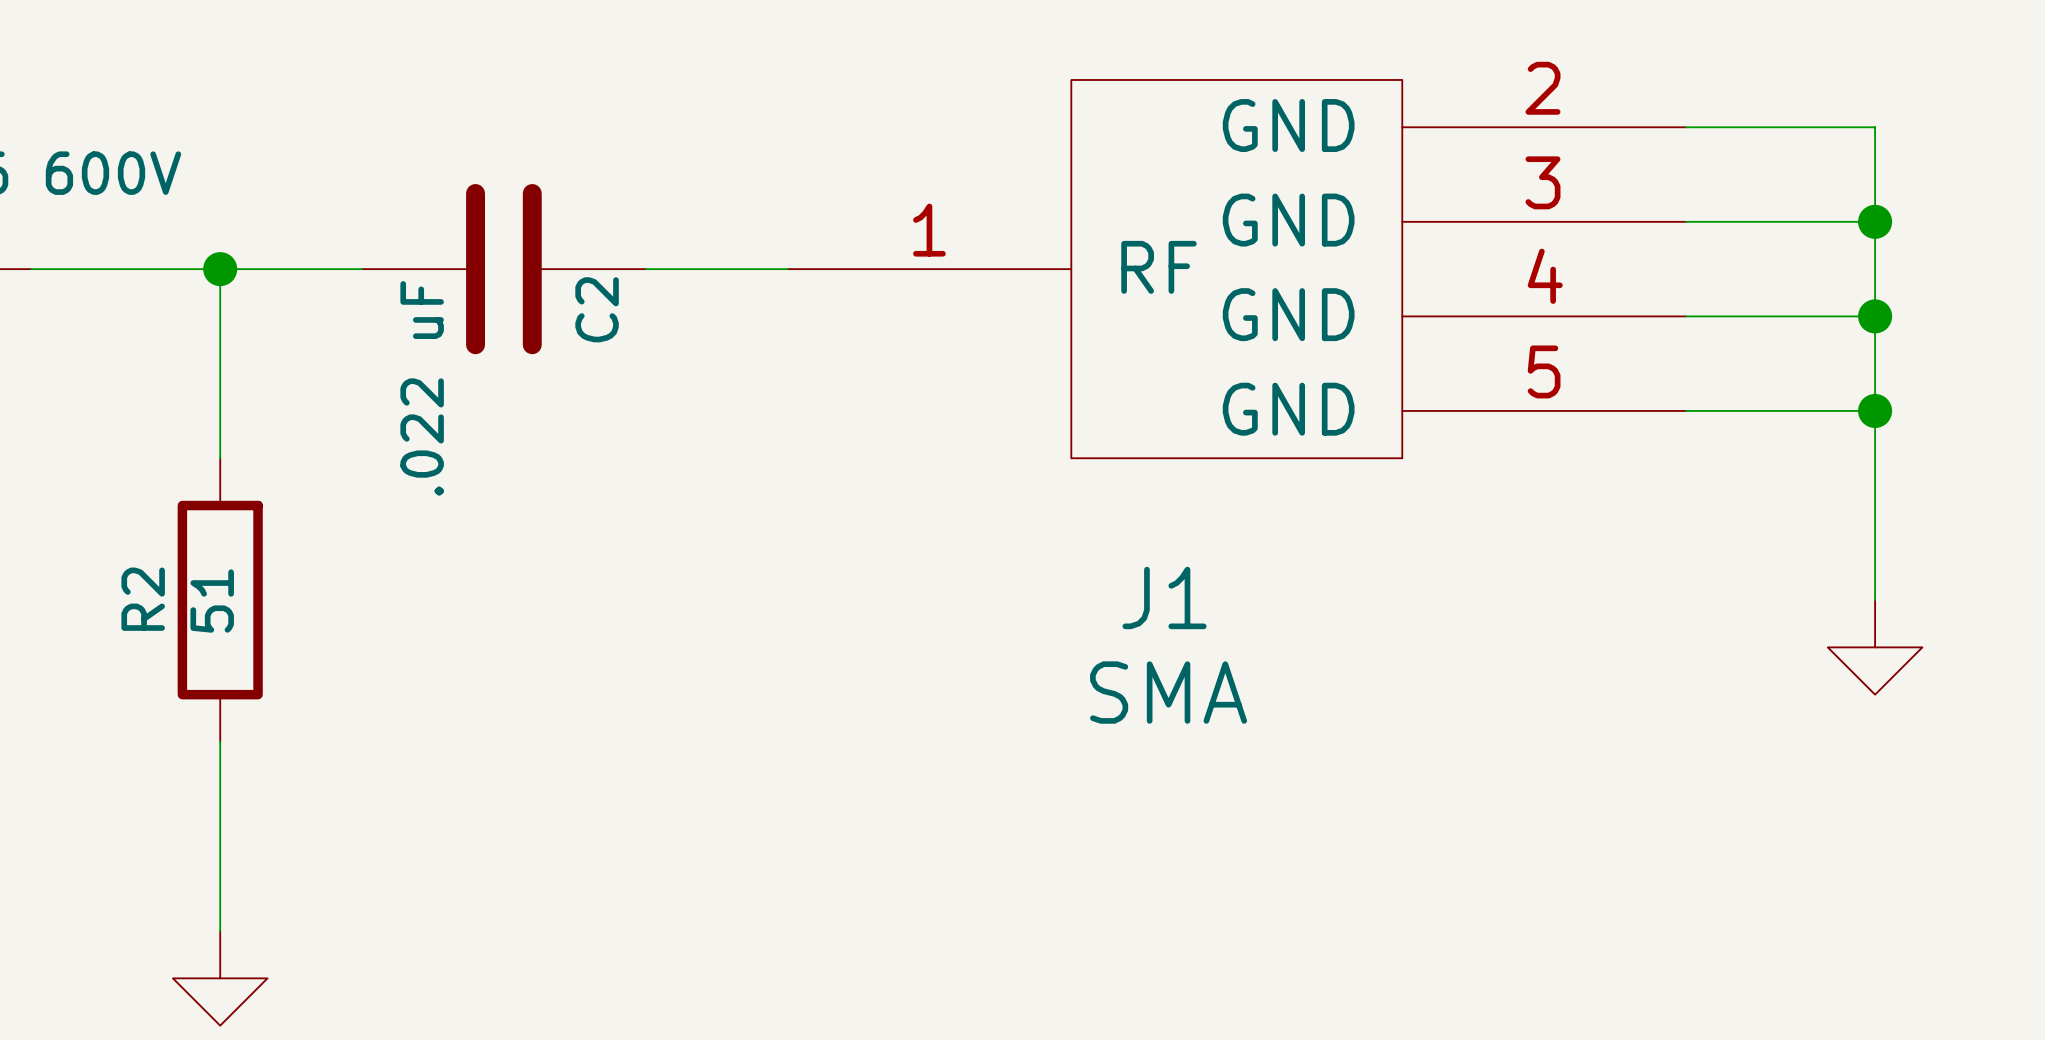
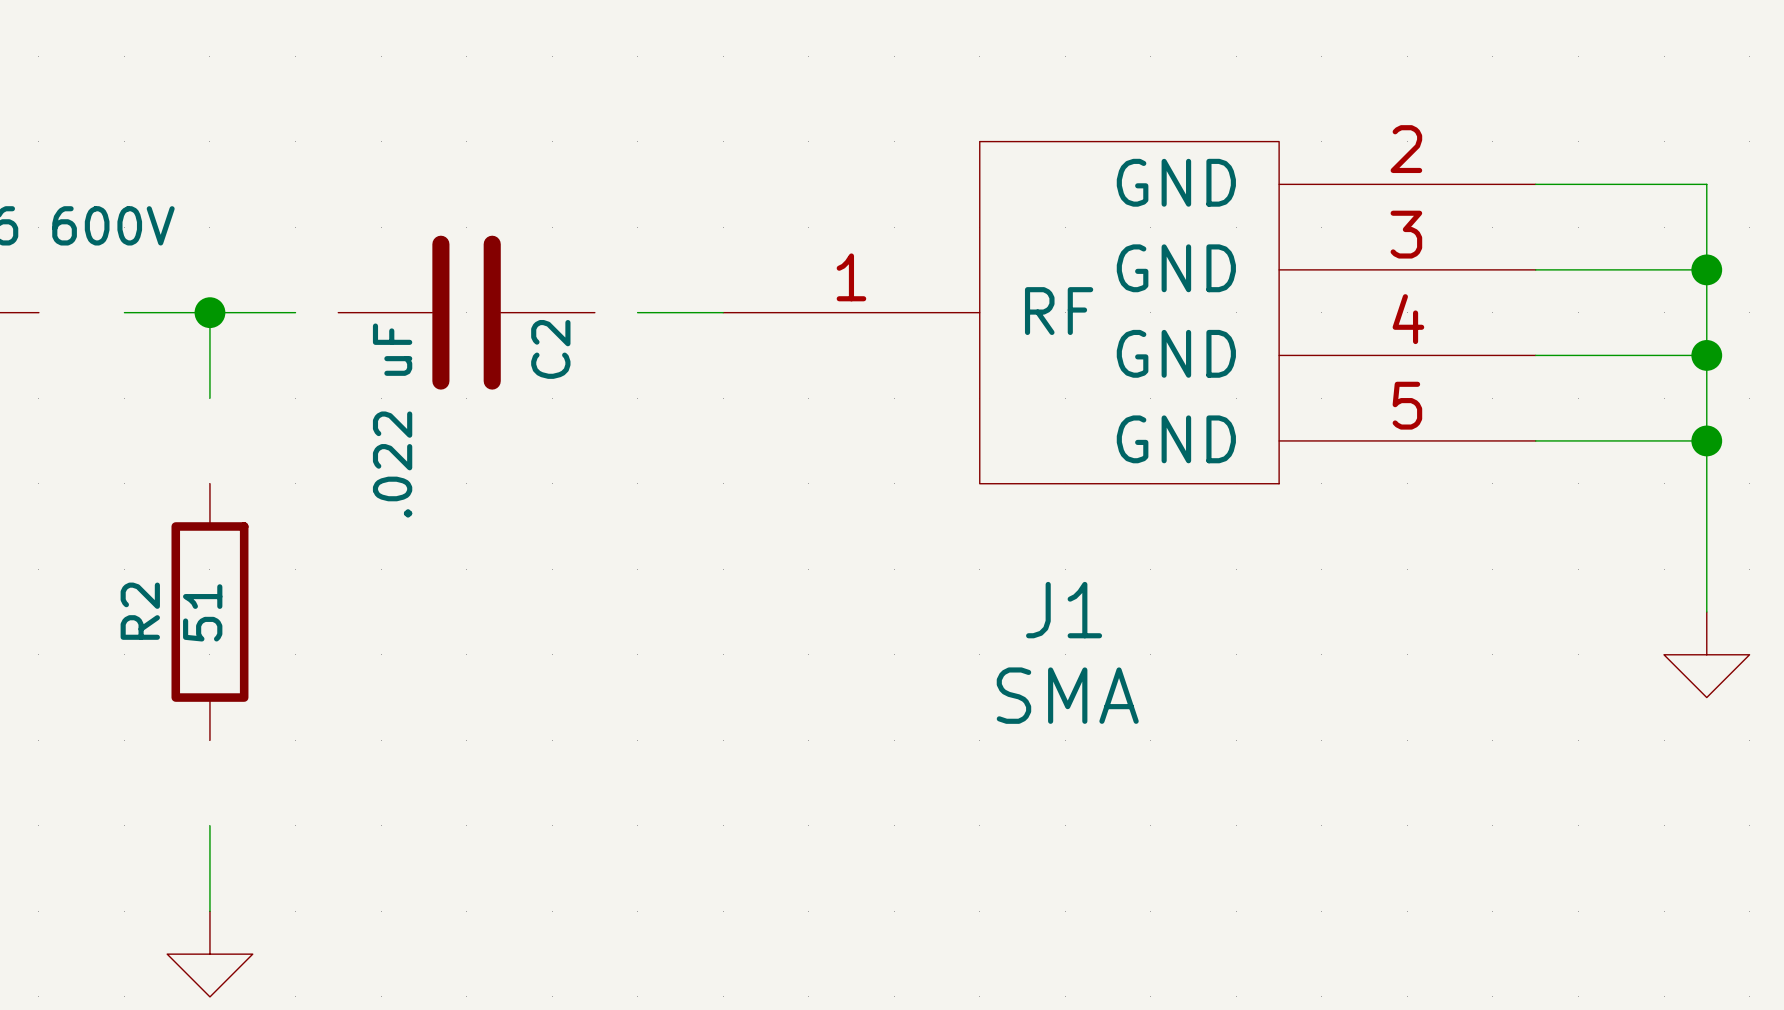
wire: (31, 269) (125, 269) -> none
wire: (314, 269) (362, 269) -> none
wire: (645, 269) (693, 269) -> none
wire: (220, 363) (220, 458) -> none
wire: (220, 741) (220, 836) -> none

